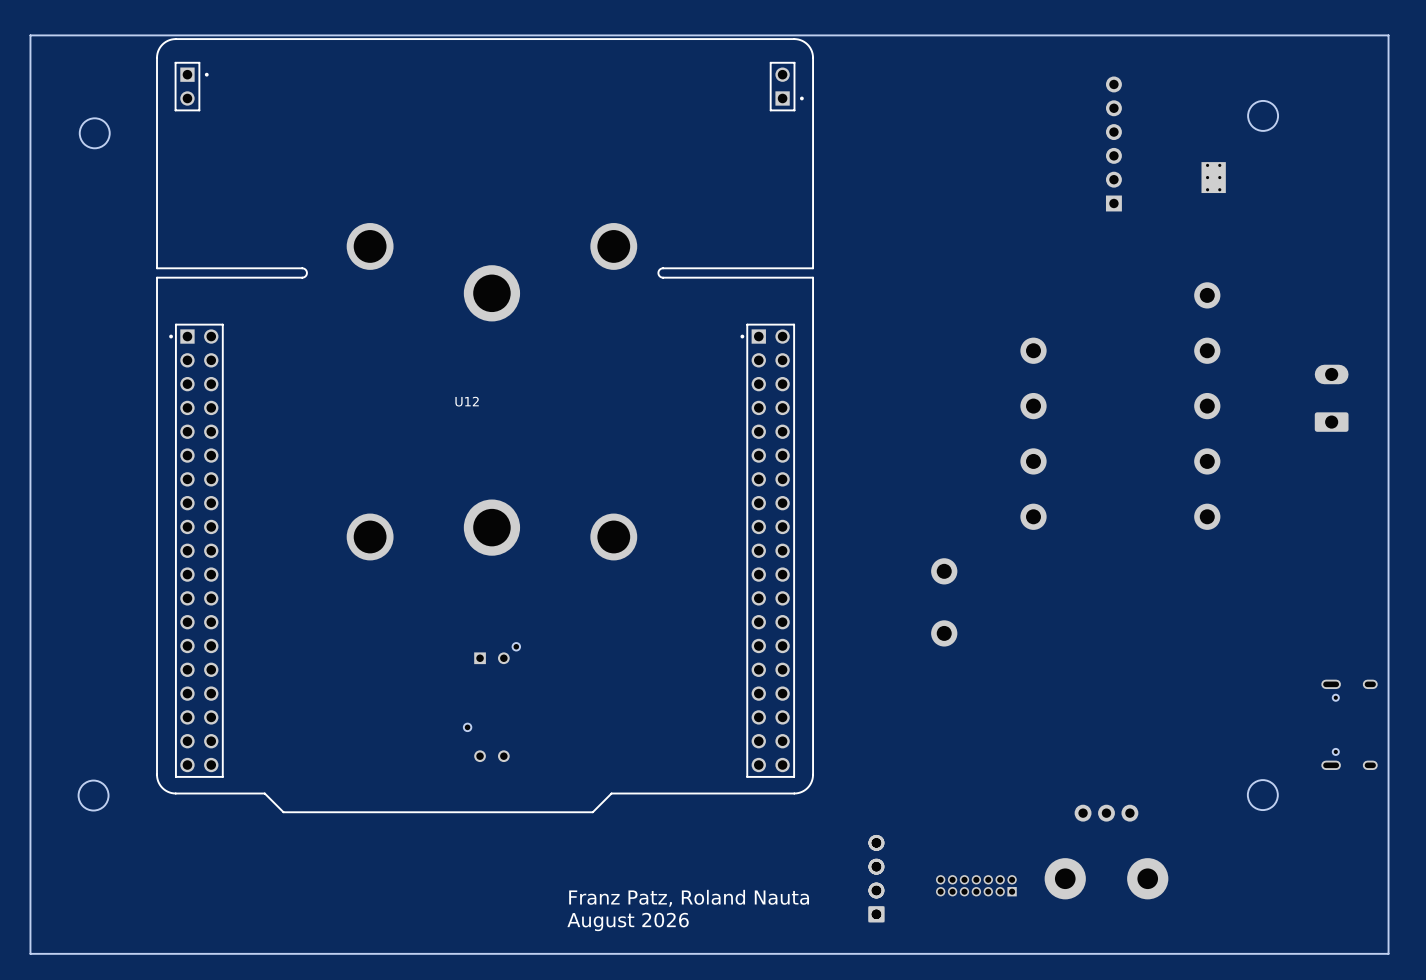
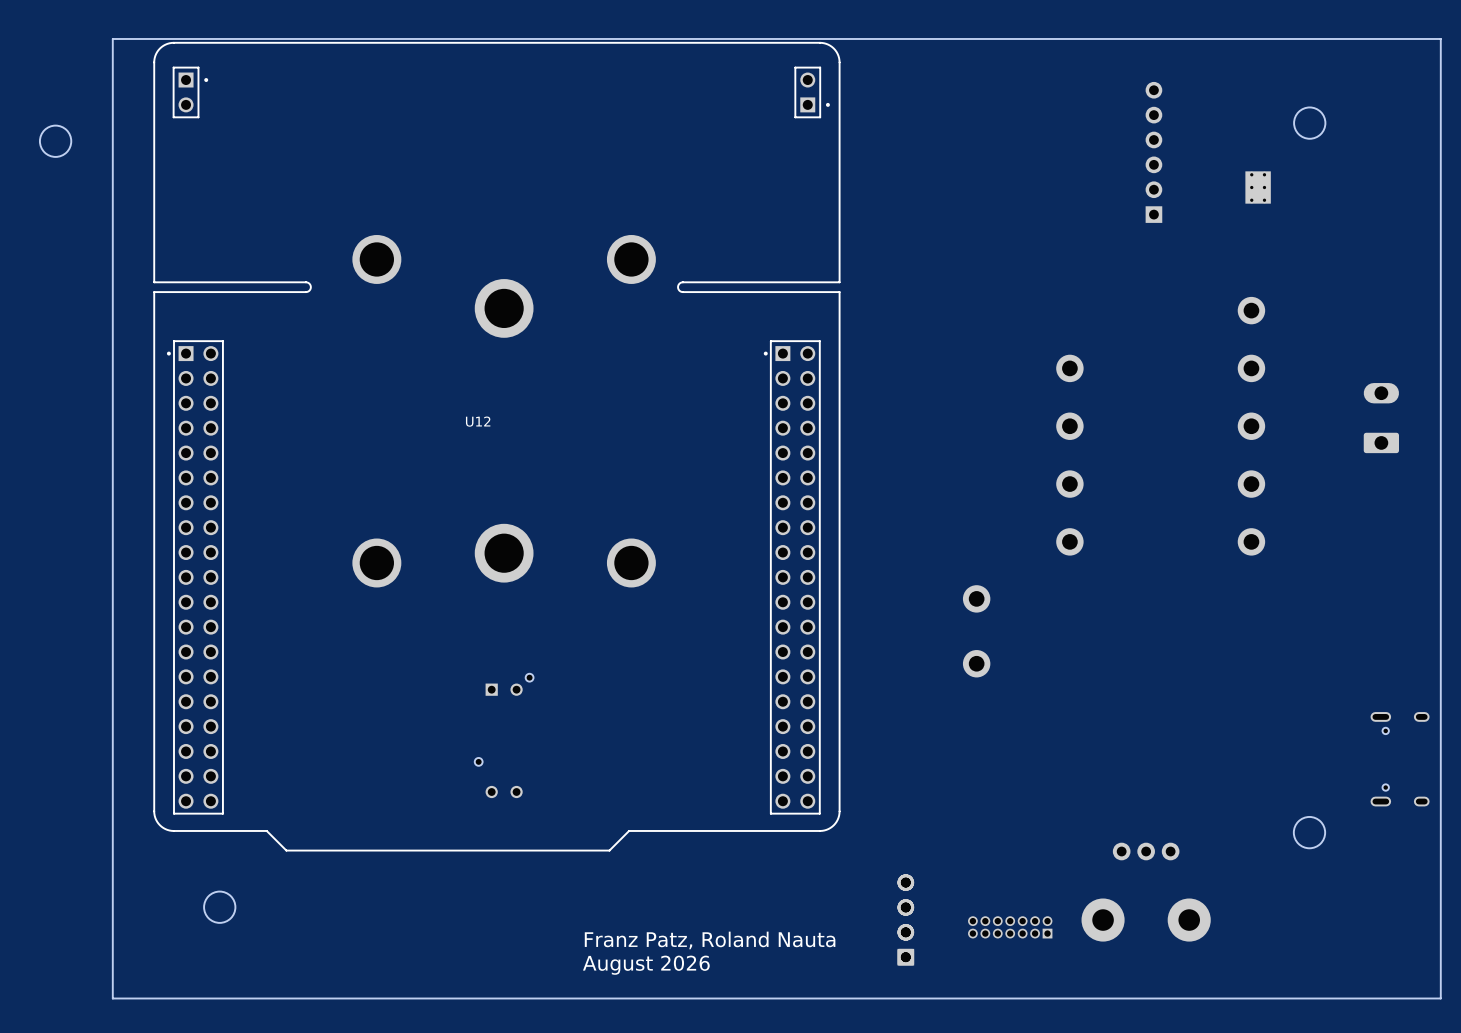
board edge: (117, 35) (30, 35) (30, 953) (117, 953) -> (112, 38) (112, 998)
round board edge position: (94, 133) -> (55, 141)
round board edge position: (93, 795) -> (219, 907)

